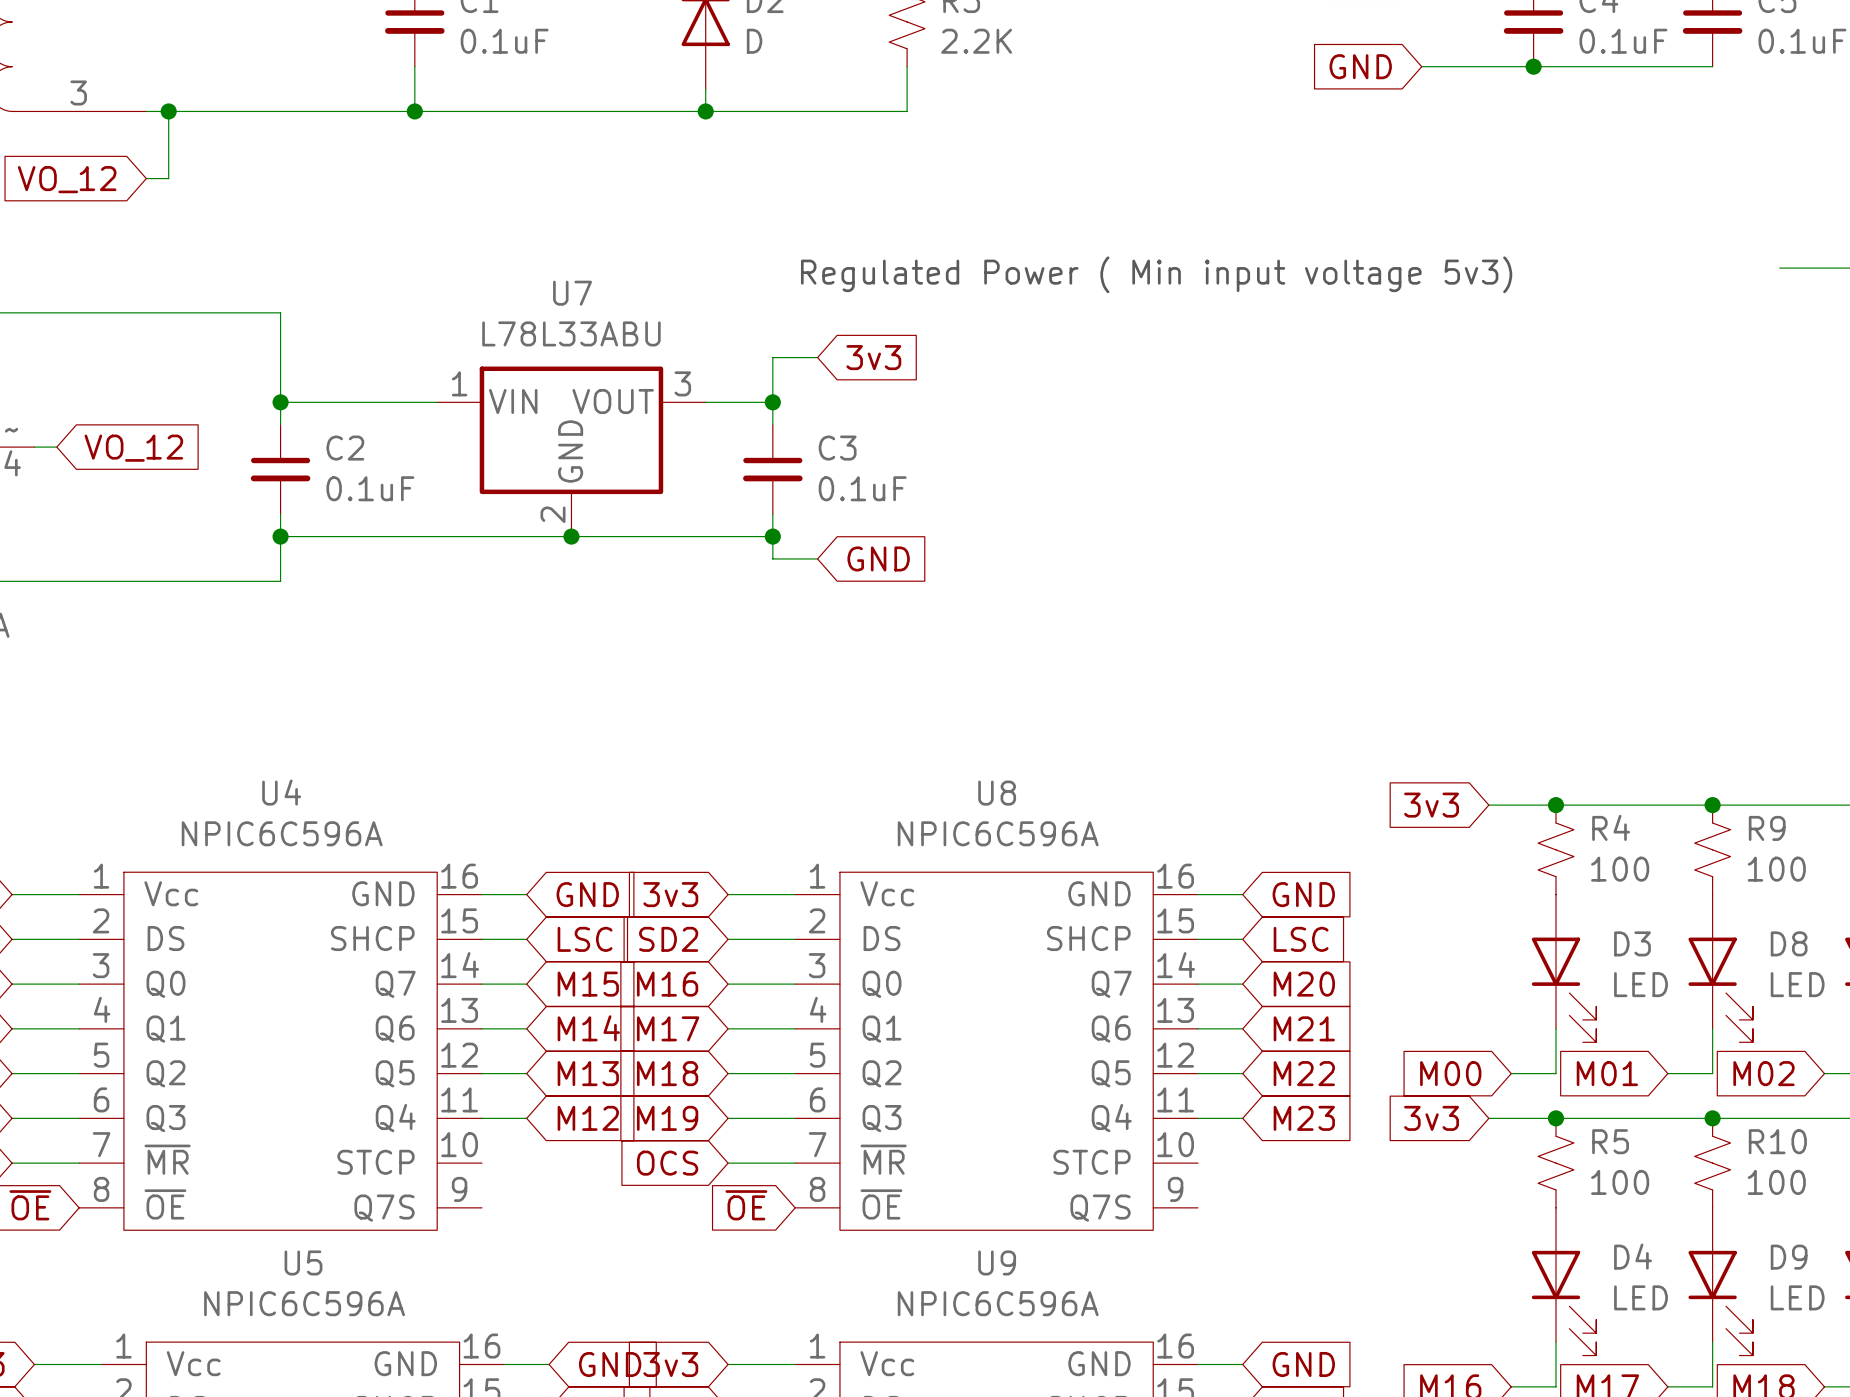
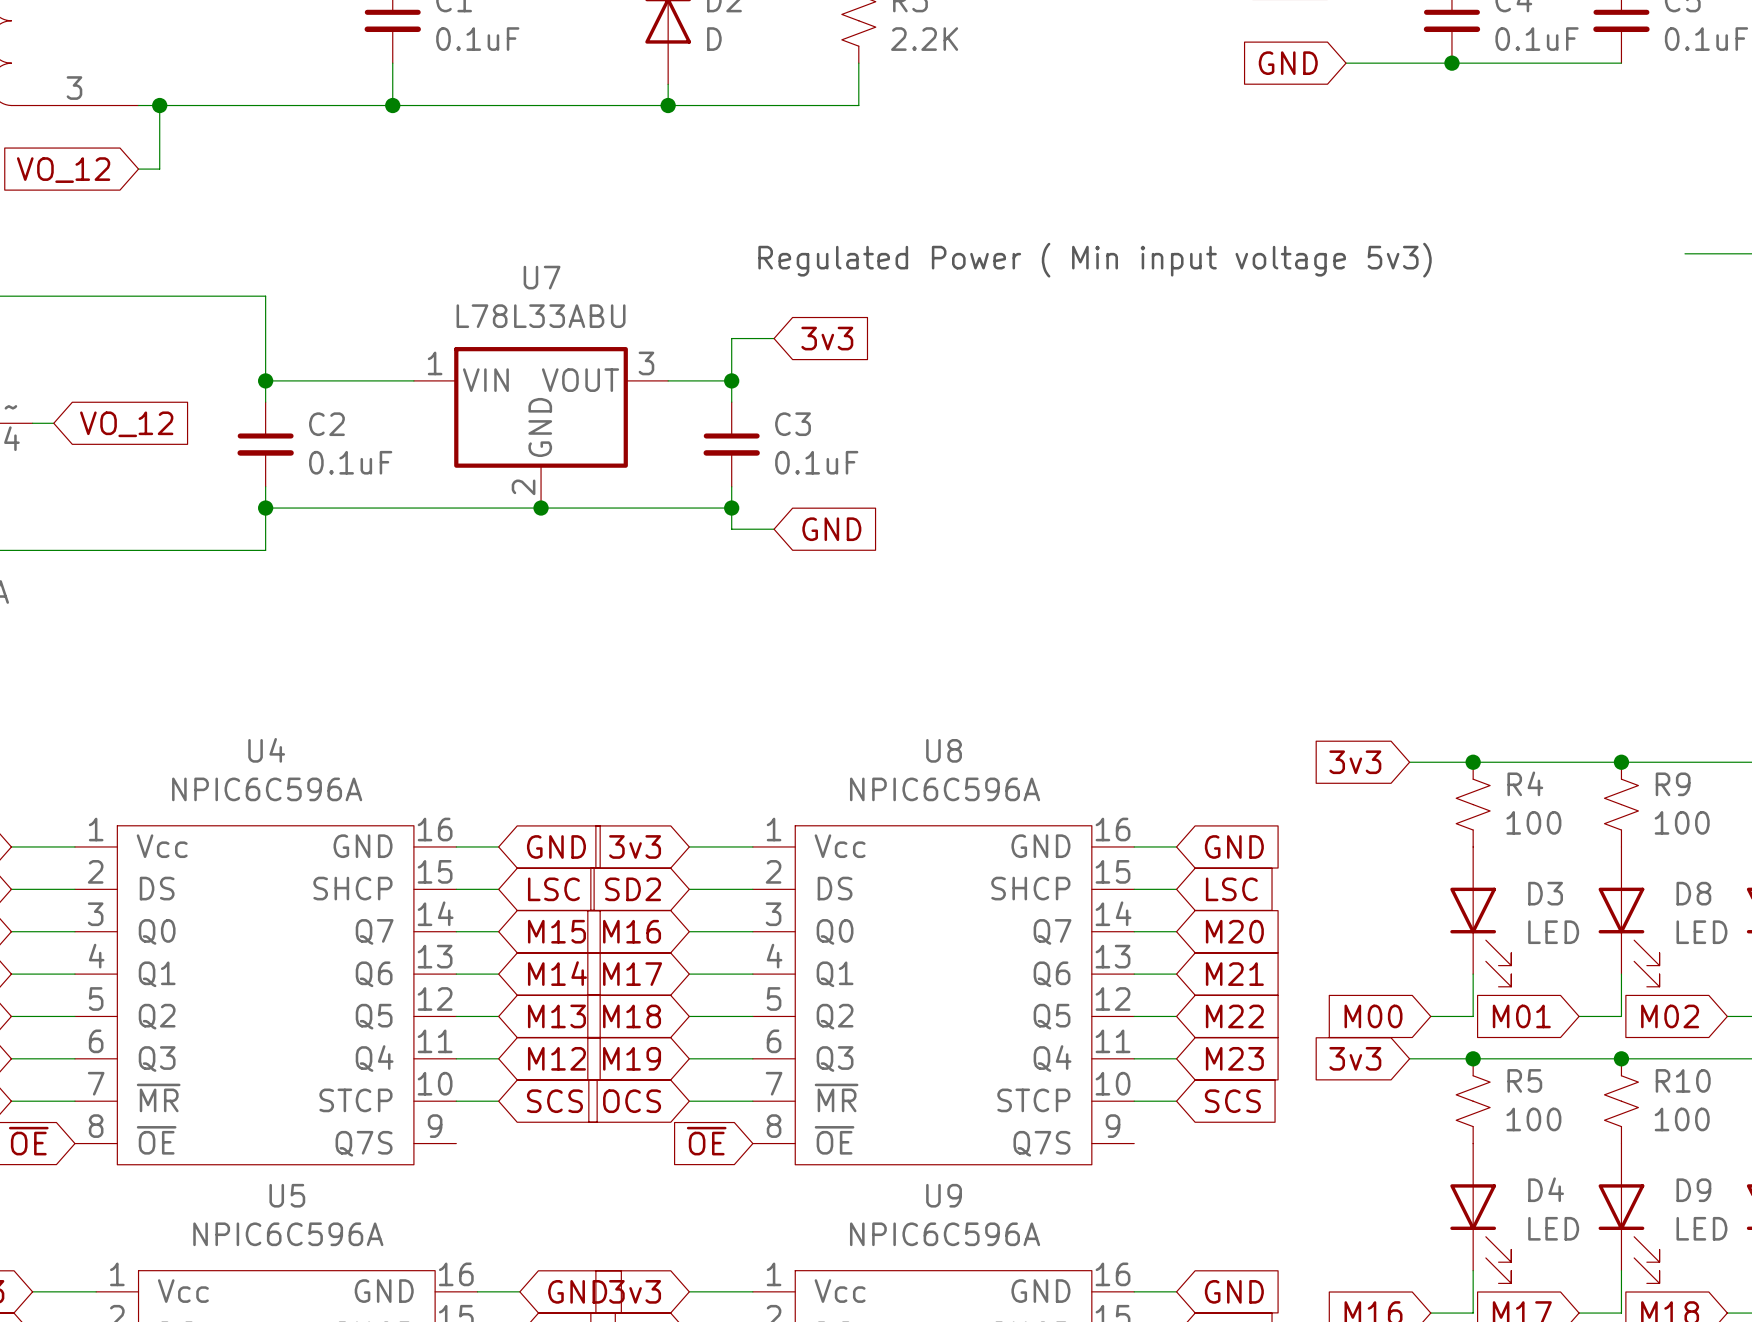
wire: none -> (456, 1101) (498, 1101)
global label: none -> SCS (554, 1101)
wire: none -> (1134, 1101) (1176, 1101)
global label: none -> SCS (1232, 1101)

